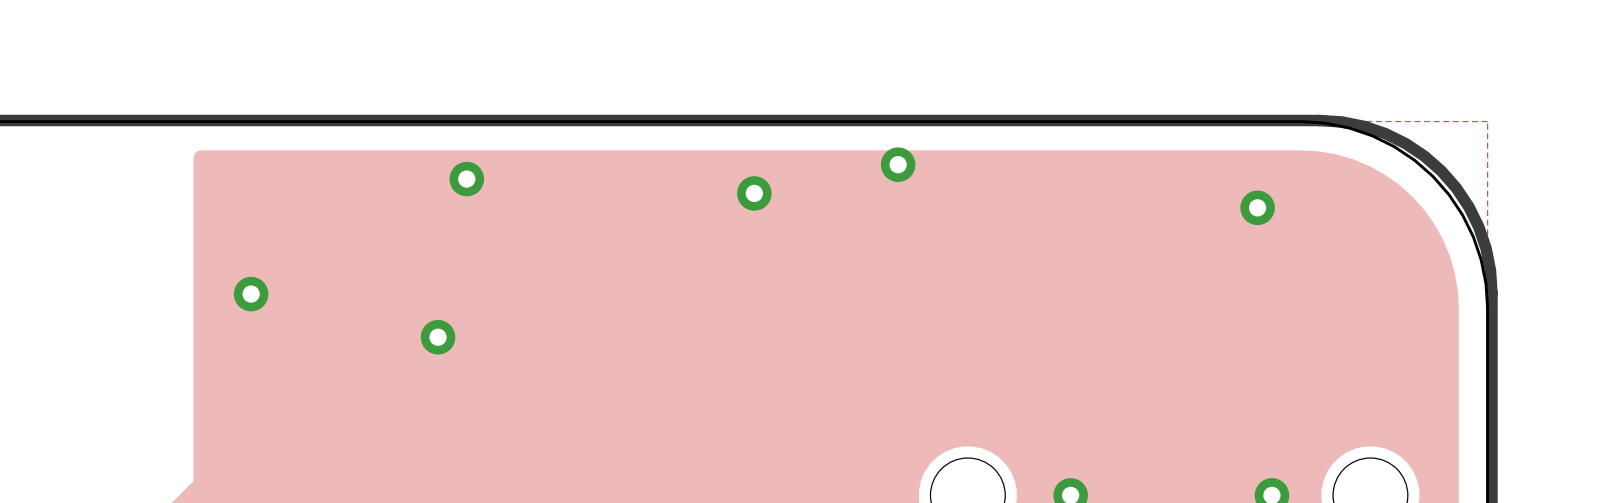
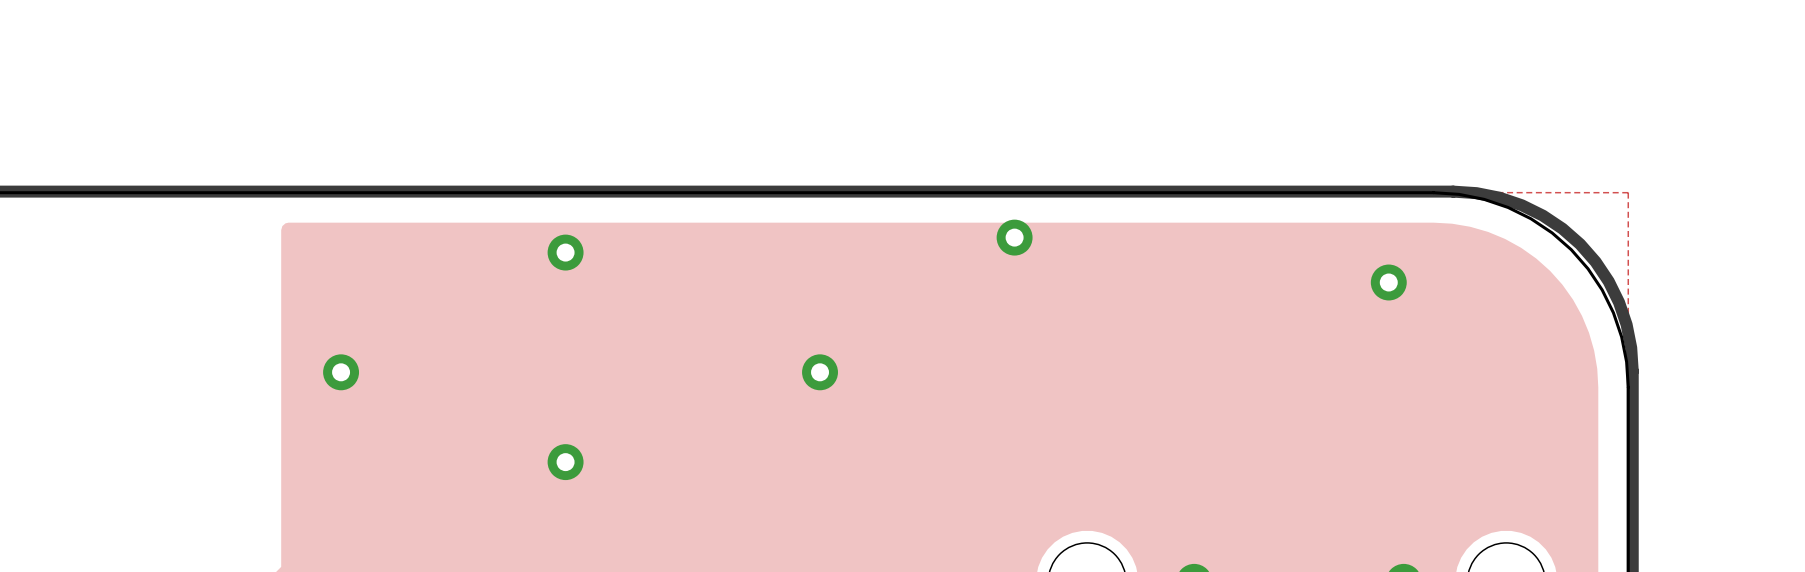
via position: (754, 193) -> (820, 372)
via position: (438, 337) -> (565, 462)

